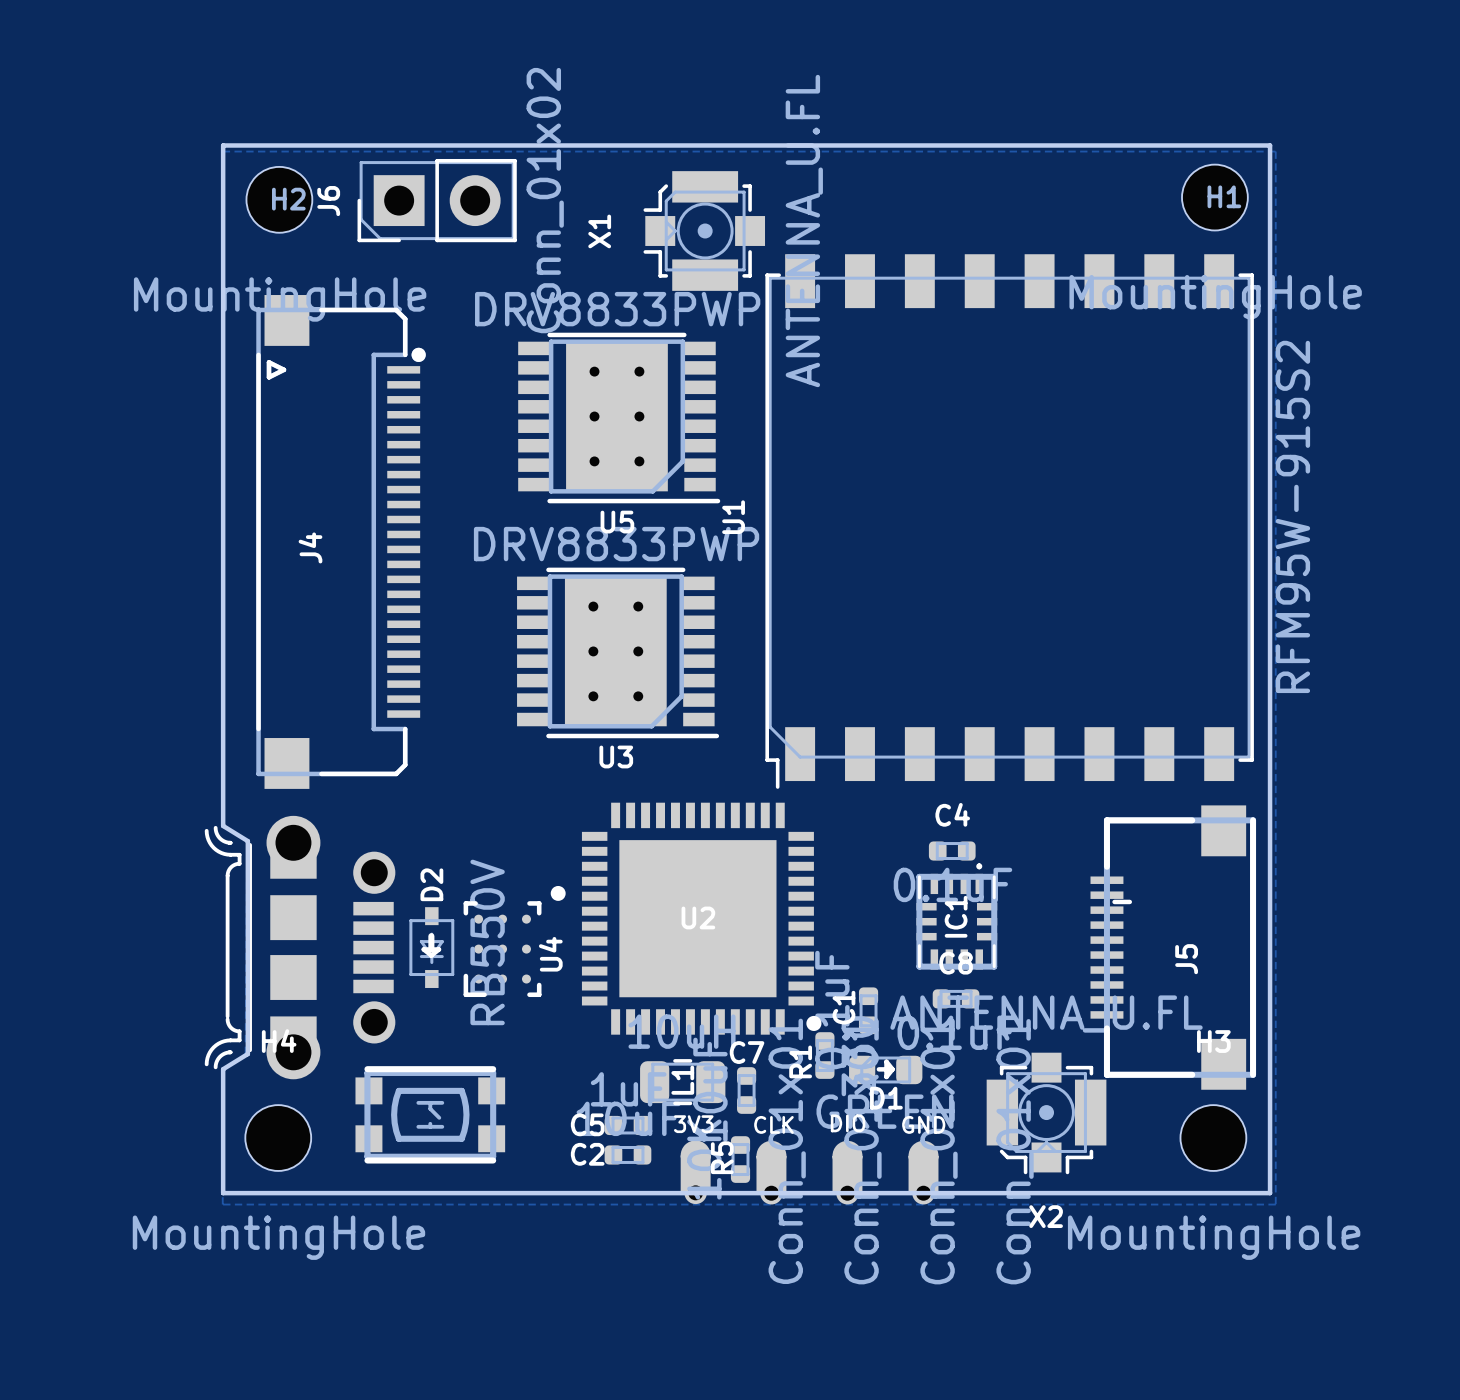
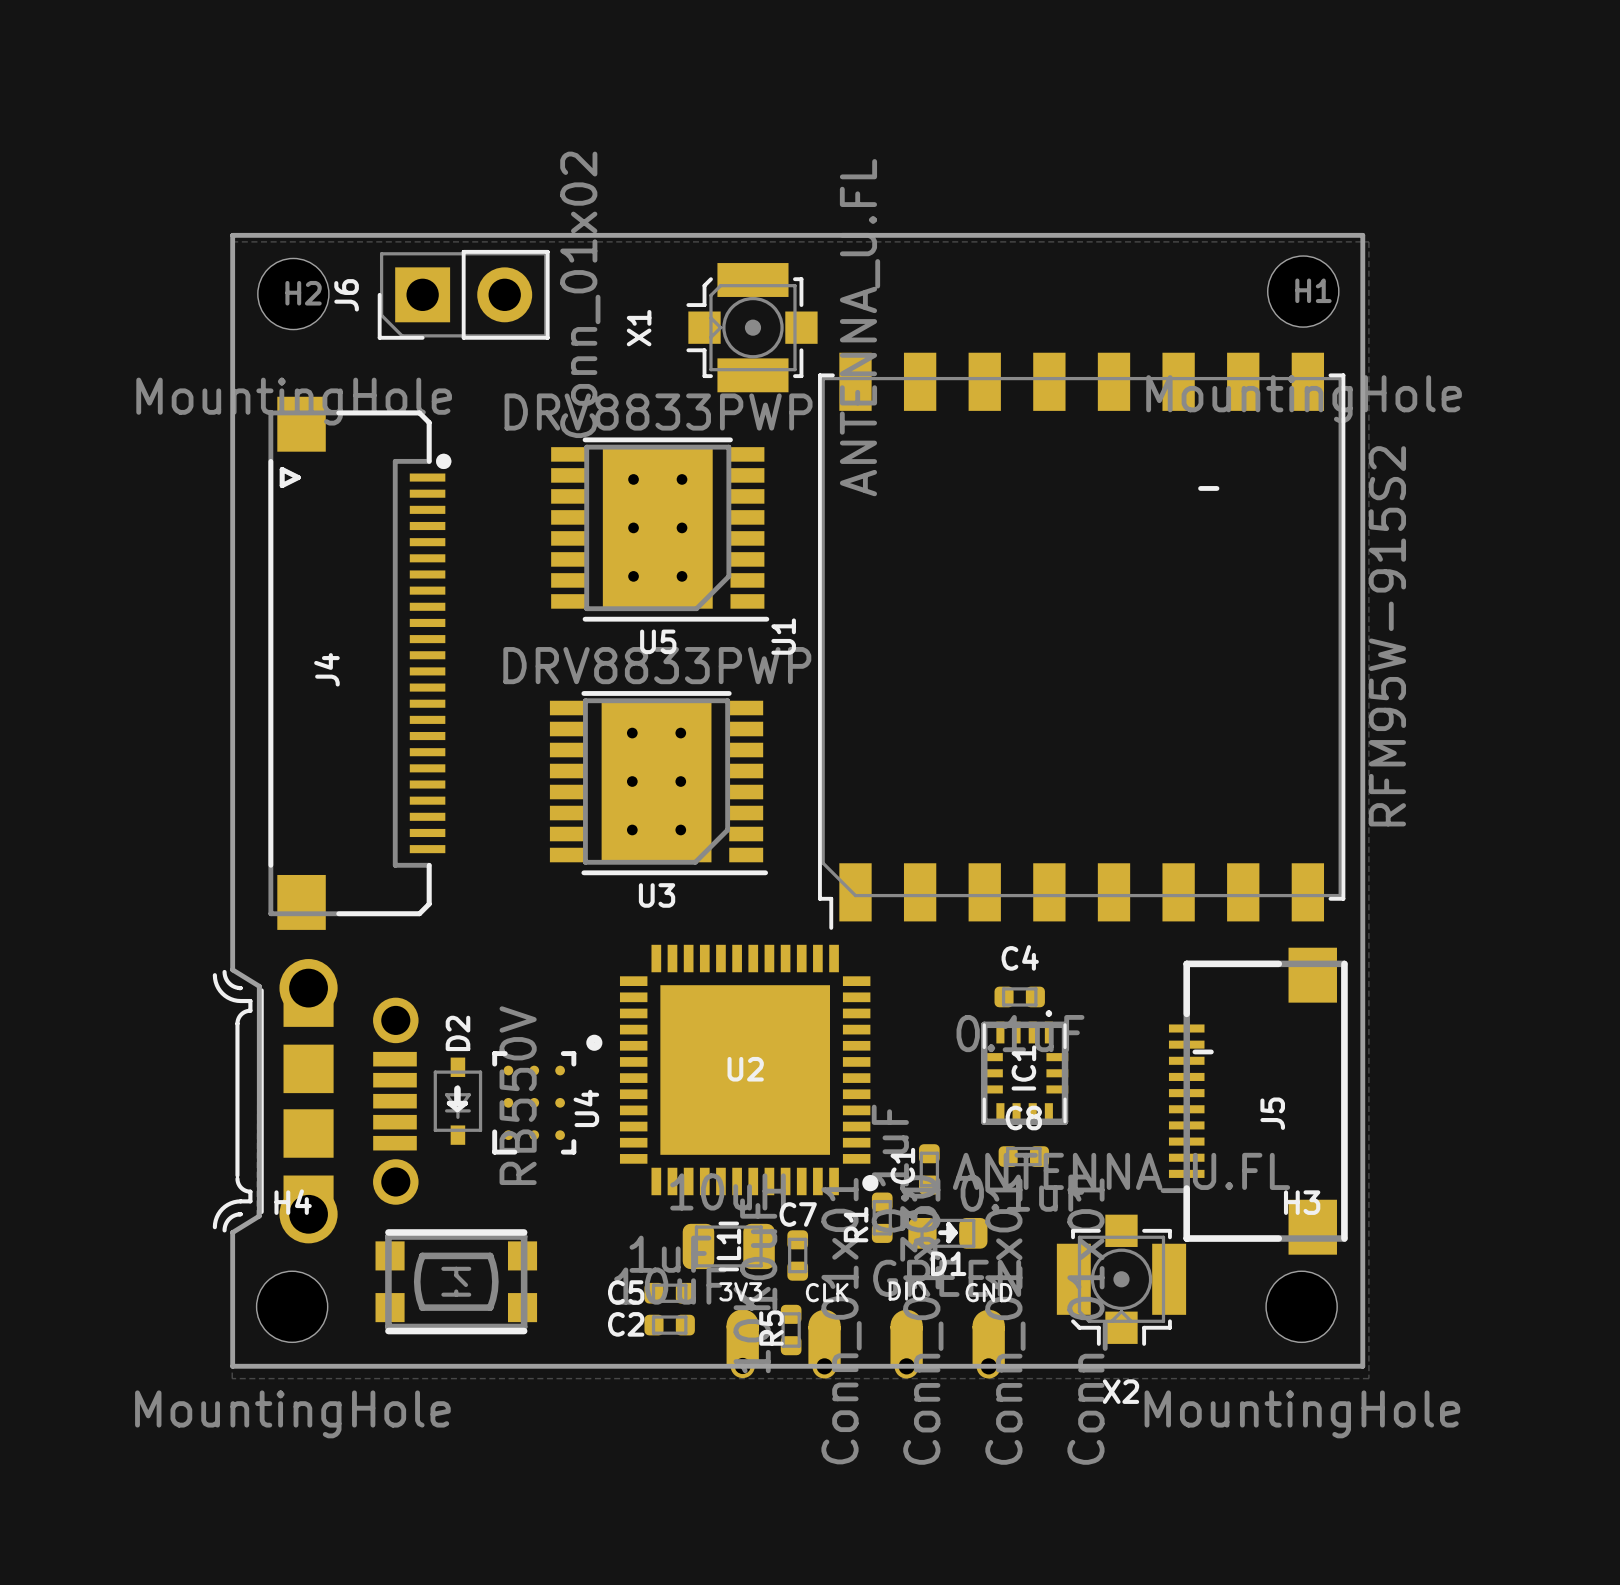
line: none -> (1200, 488) (1216, 488)

